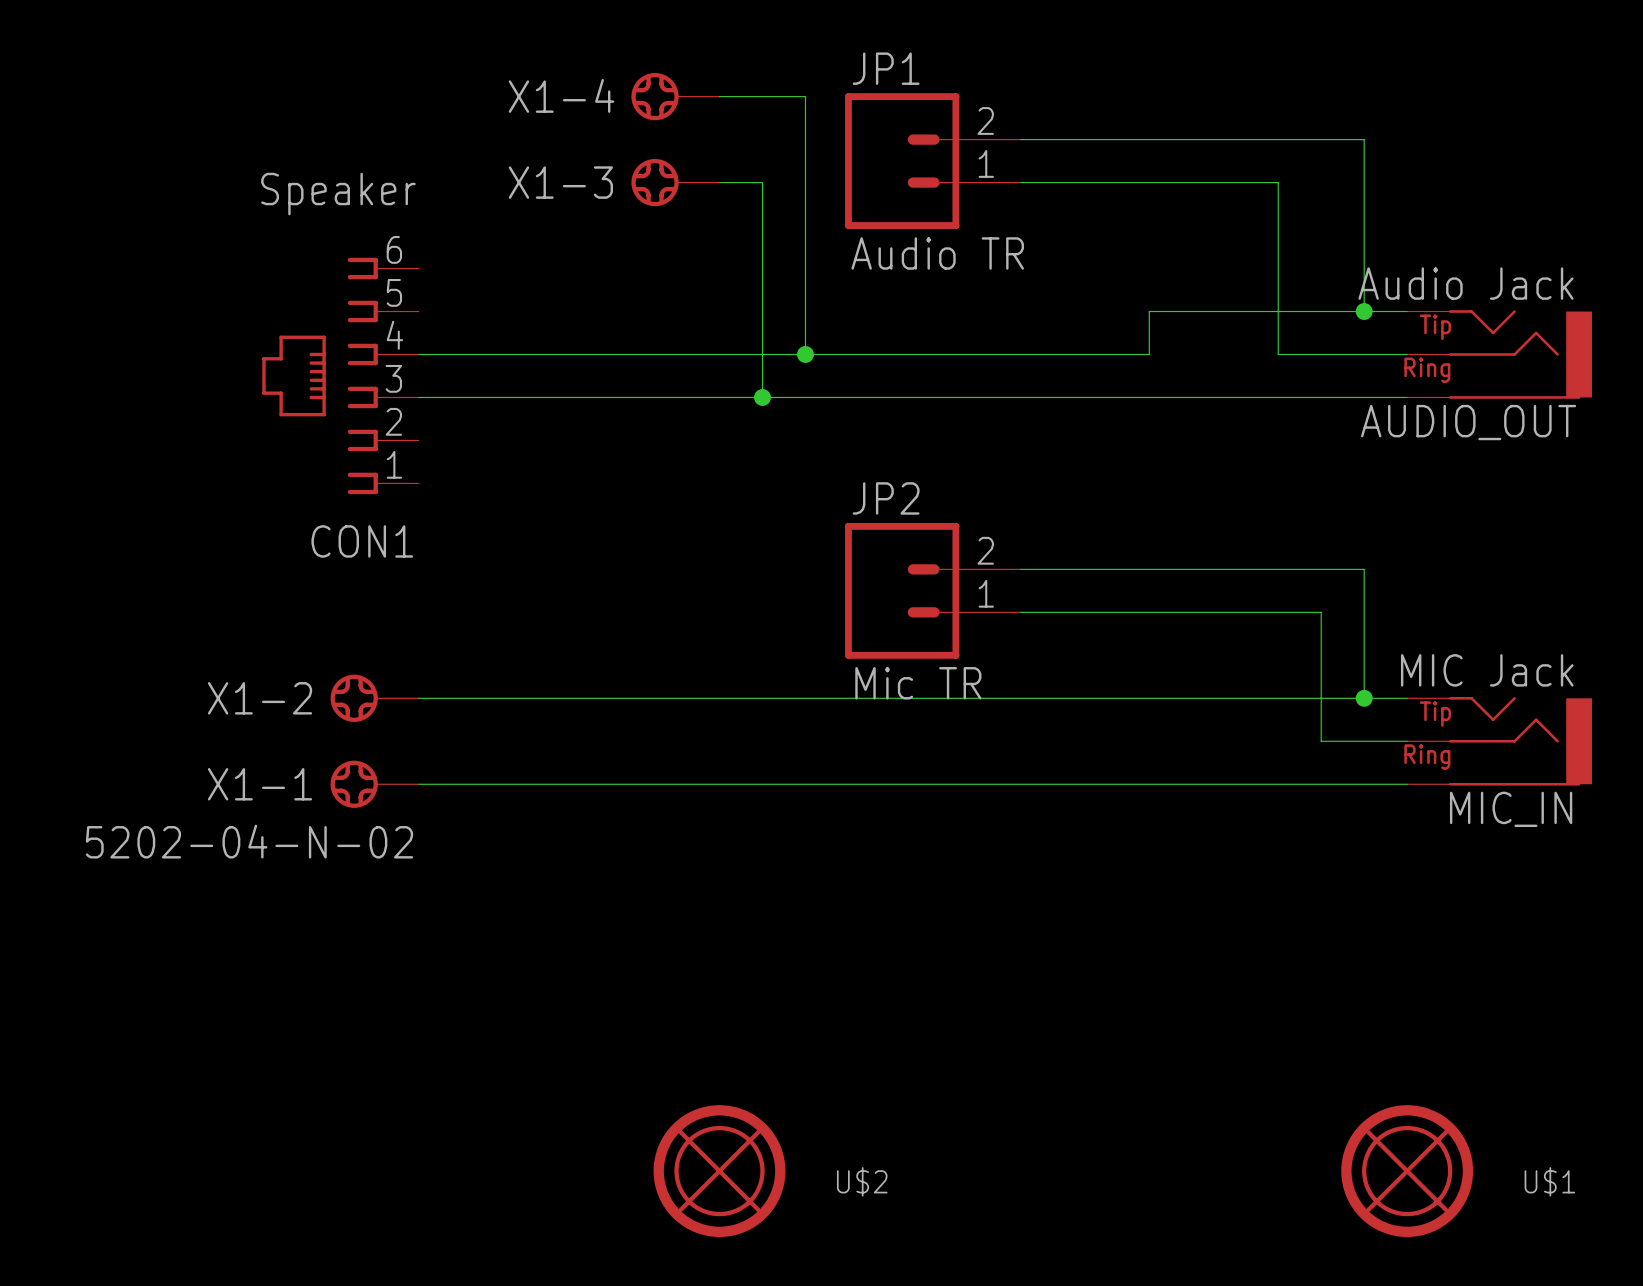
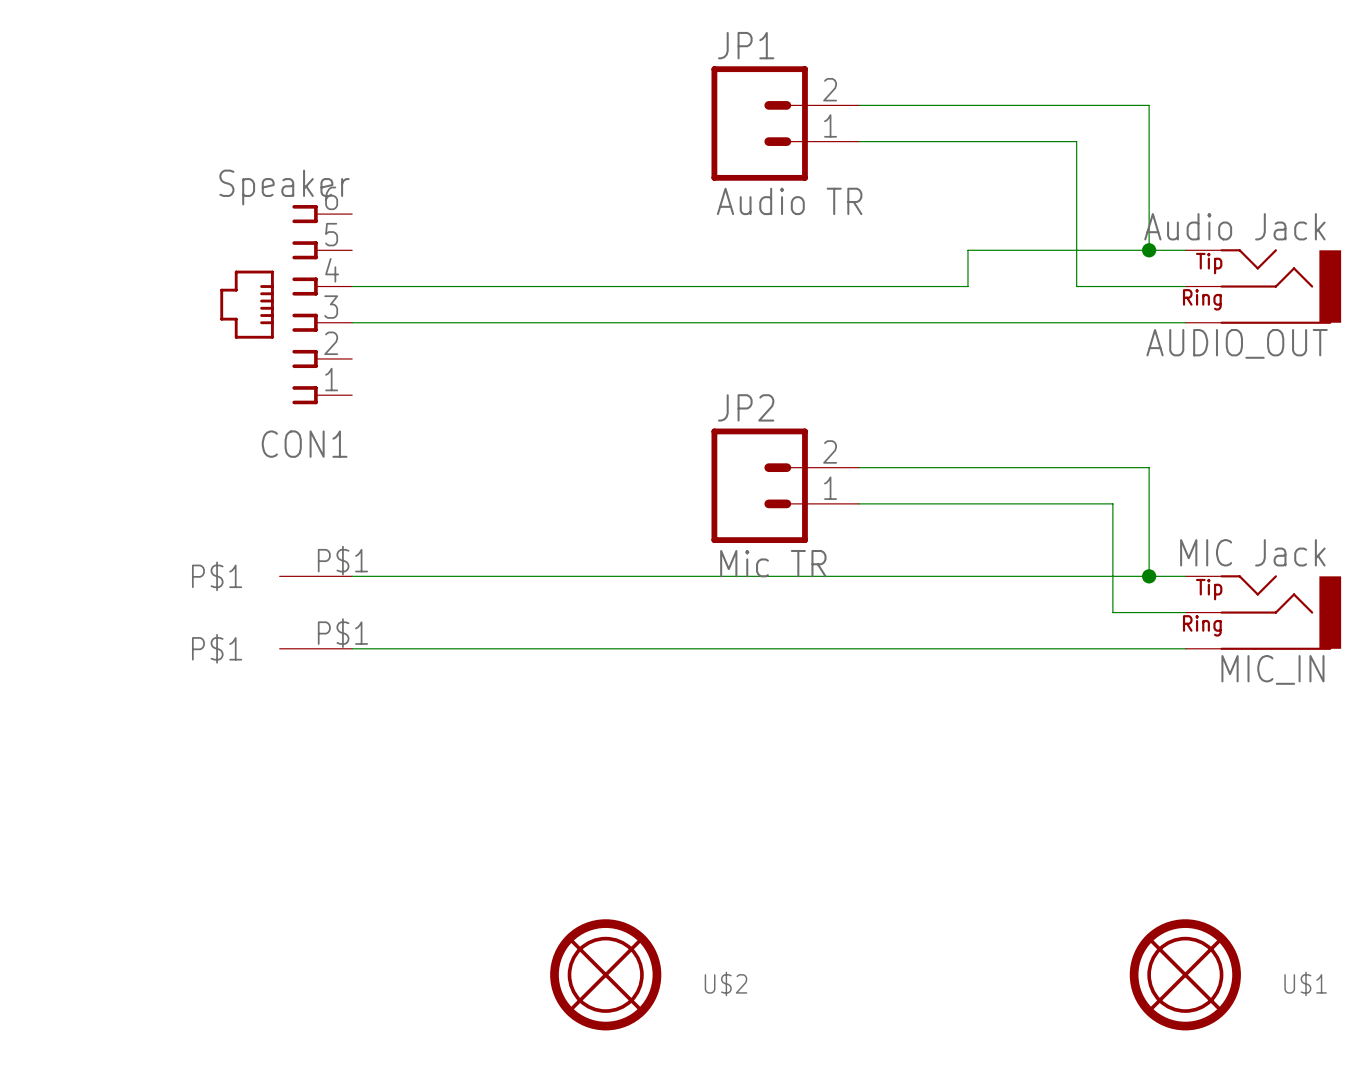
X1-4: (675, 96) -> none
wire: (719, 96) (805, 96) (805, 354) -> none
X1-3: (675, 182) -> none
wire: (719, 182) (762, 182) (762, 397) -> none
CON1 value position: Speaker (338, 194) -> Speaker (284, 187)
junction: (805, 354) -> none
junction: (762, 397) -> none
X1-2: (374, 698) -> none
part: none -> (315, 576)
X1-1: 5202-04-N-02 (374, 784) -> none
part: none -> (315, 648)

